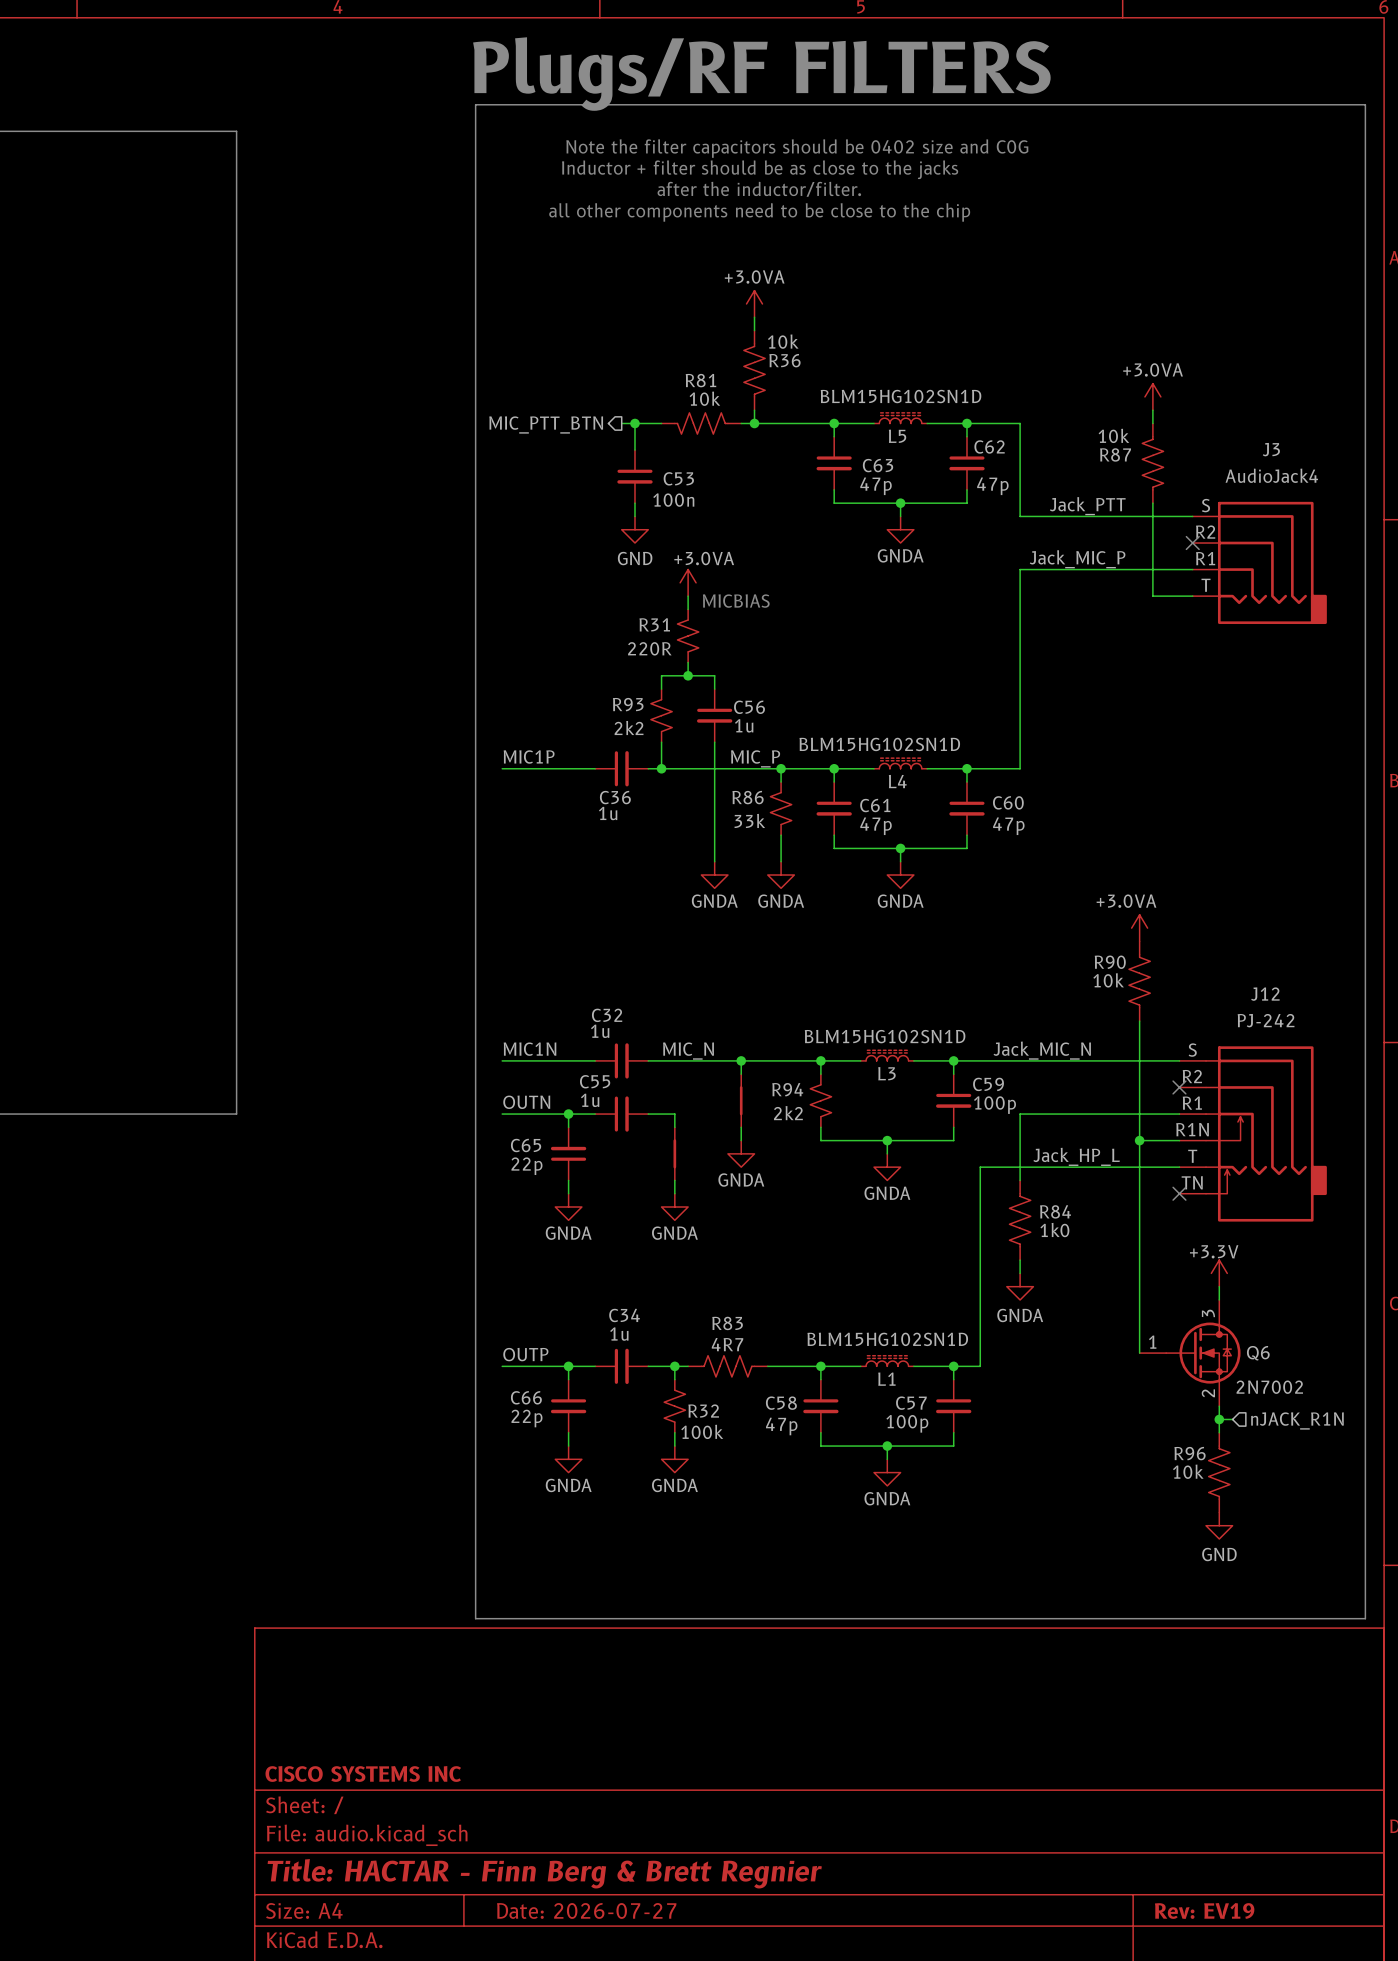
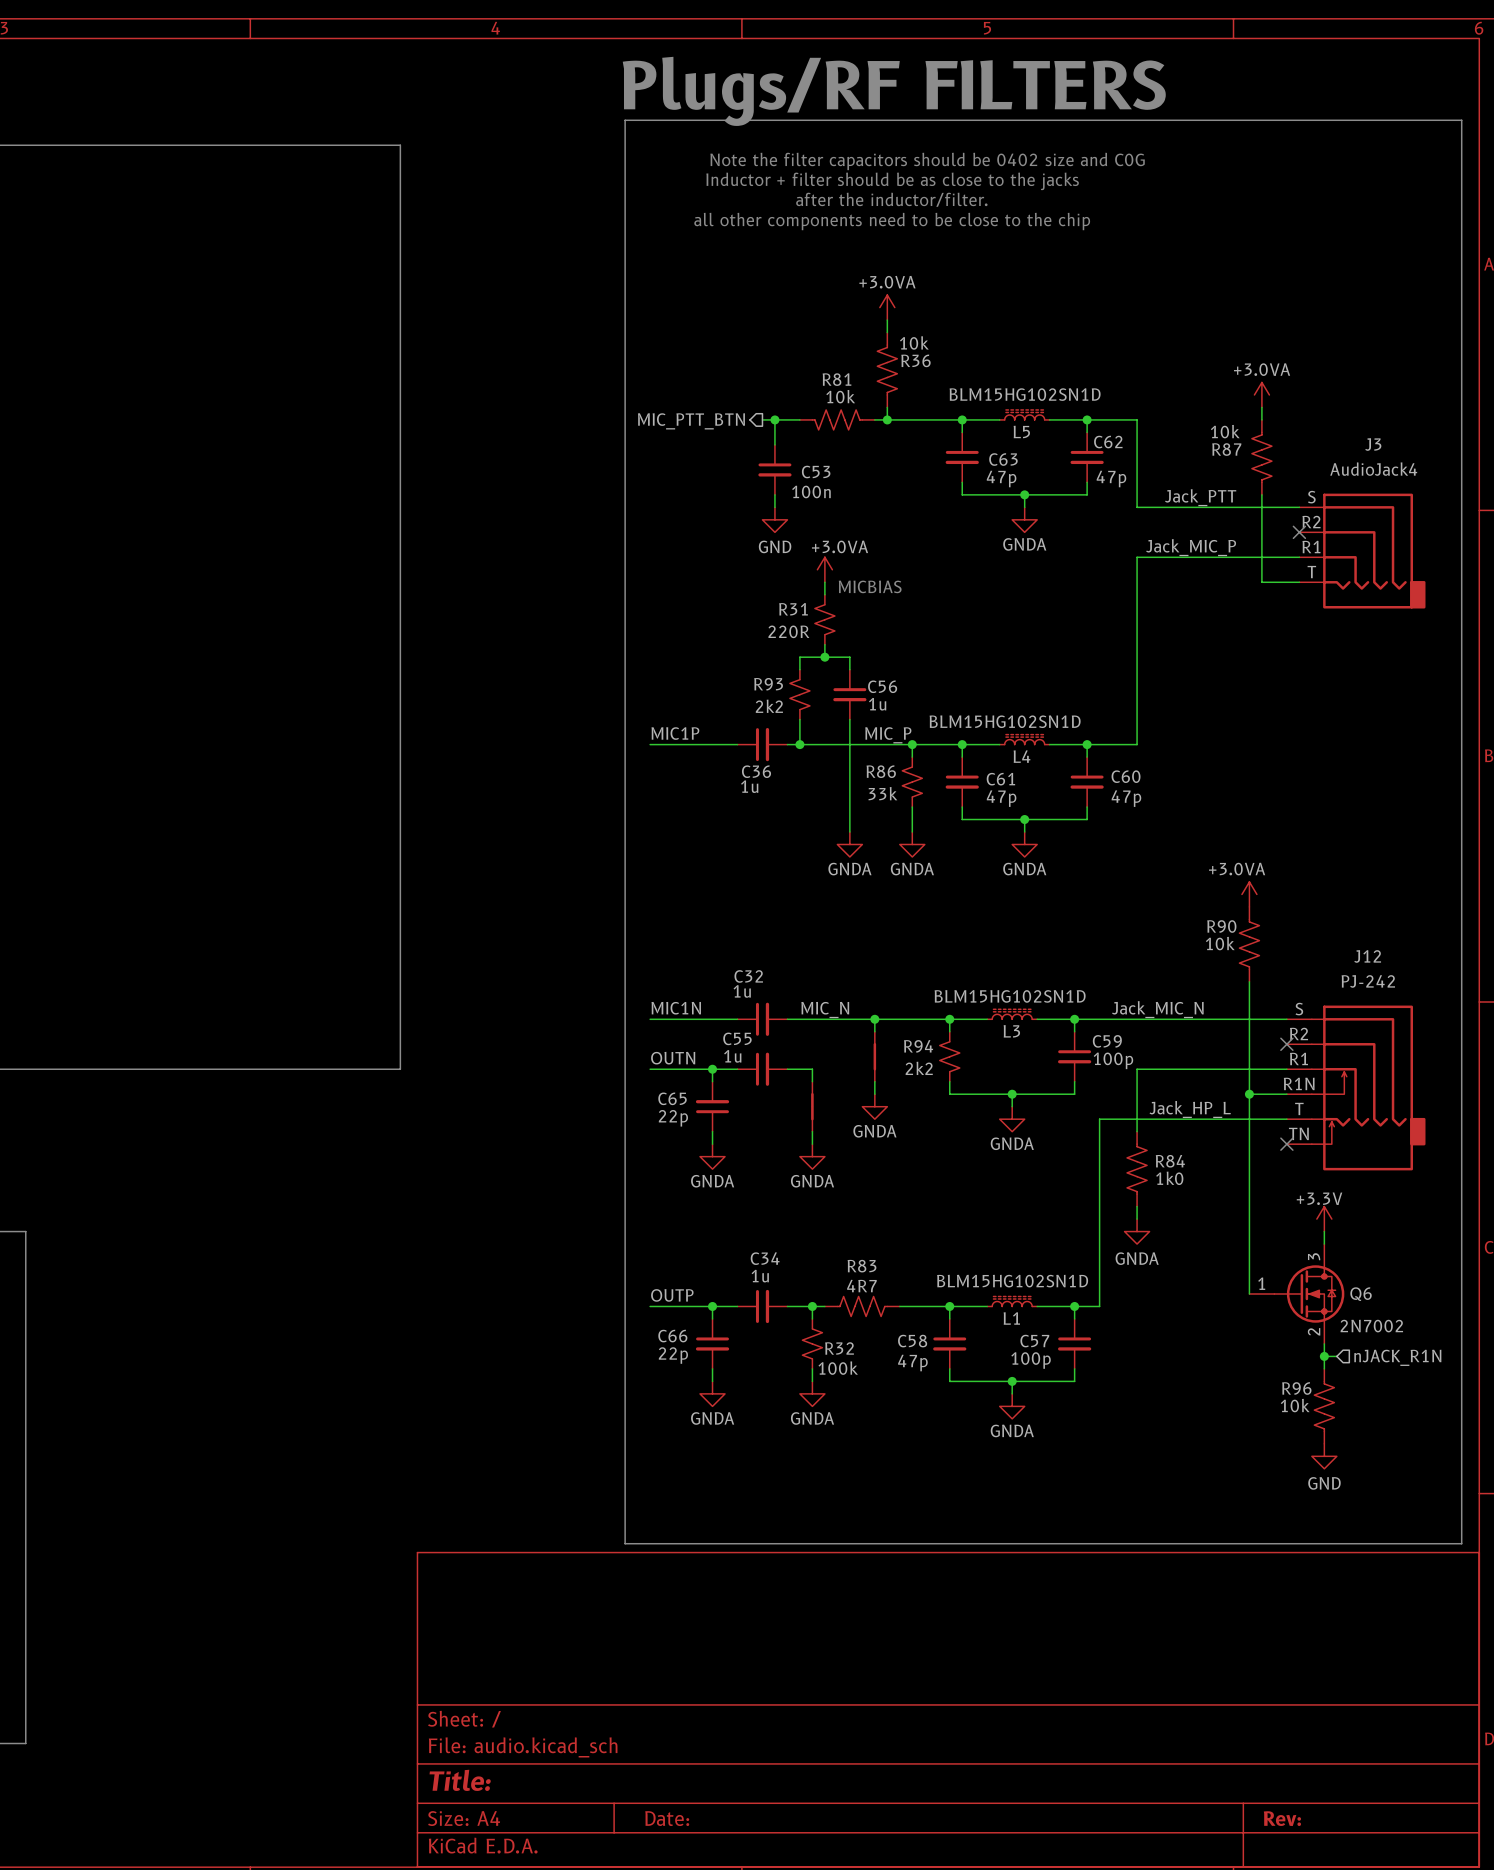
title block: CISCO SYSTEMS INC (363, 1773) -> none
title block: Title: HACTAR - Finn Berg & Brett Regnier (544, 1873) -> Title: (460, 1780)
title block: Date: 2026-07-27 (586, 1910) -> Date: (667, 1818)
title block: Rev: EV19 (1204, 1911) -> Rev: (1282, 1818)

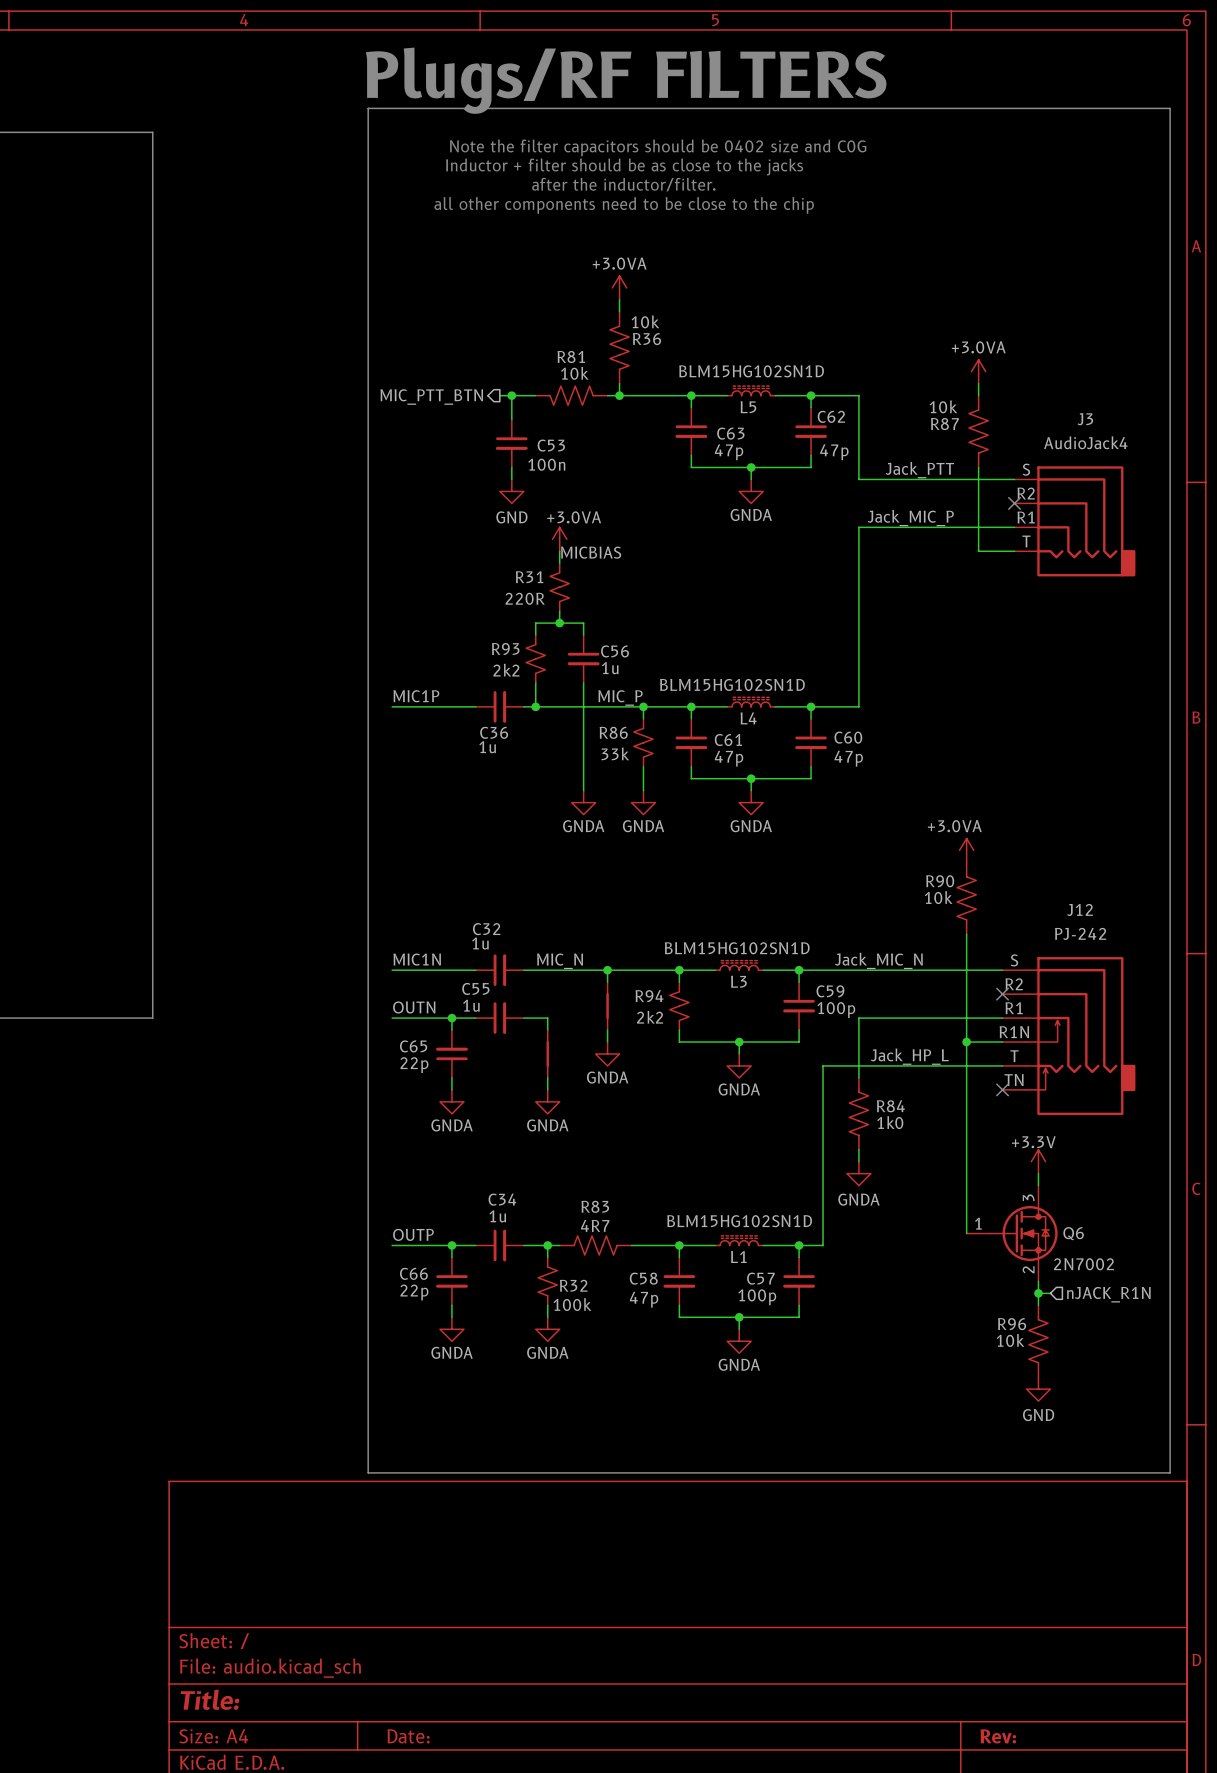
label: none -> MICBIAS (591, 552)
text: MICBIAS (870, 586) -> none

